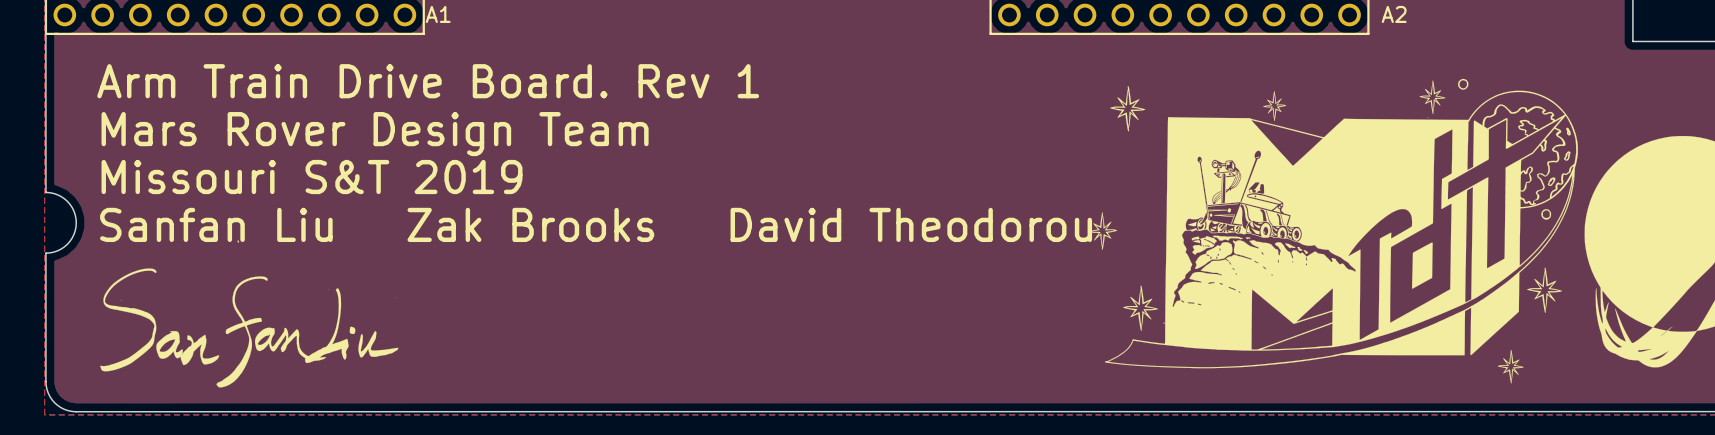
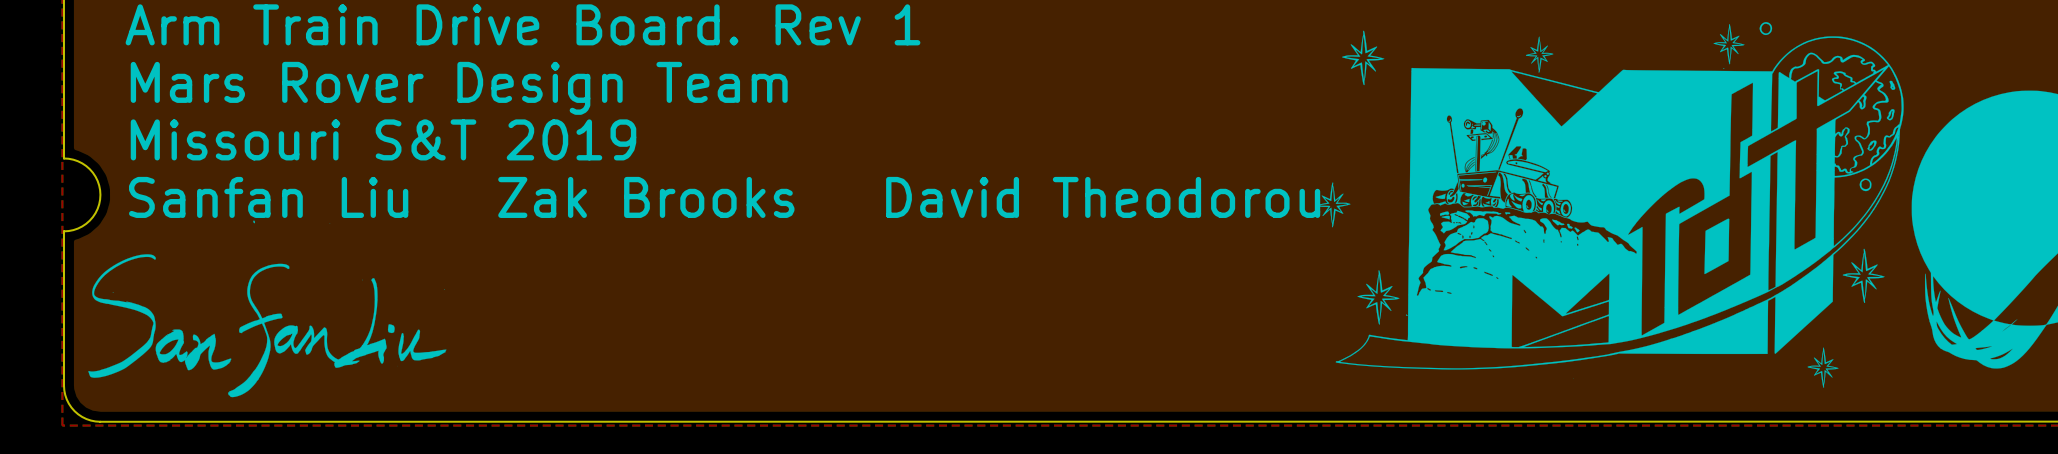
drawing position: (249, 313) -> (267, 308)

